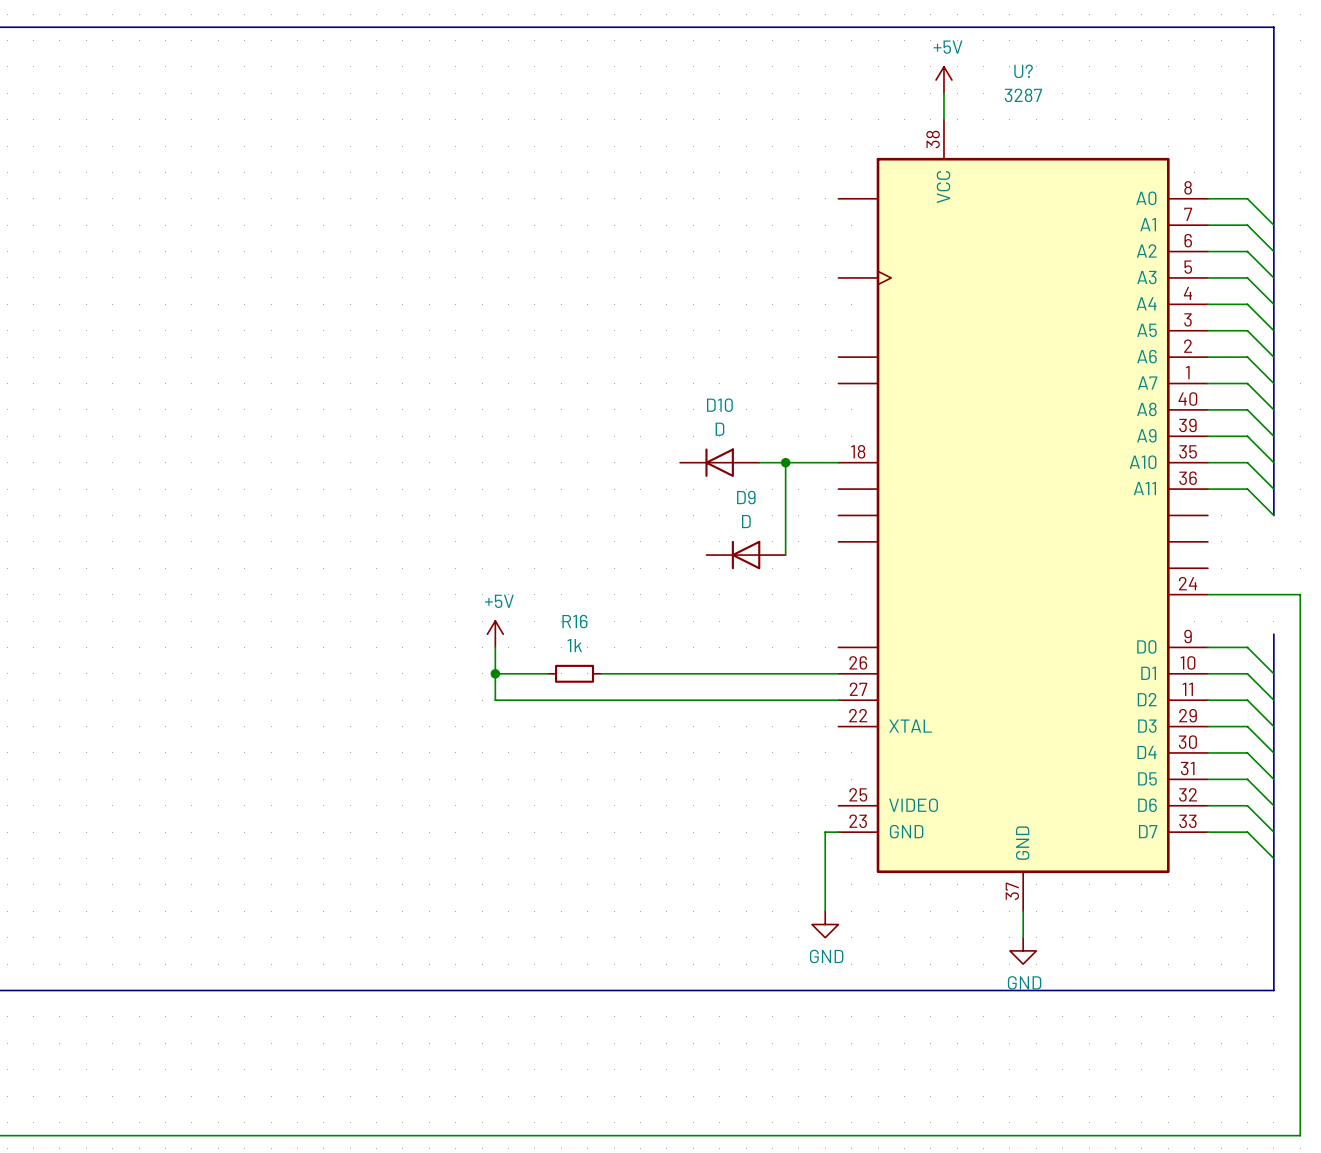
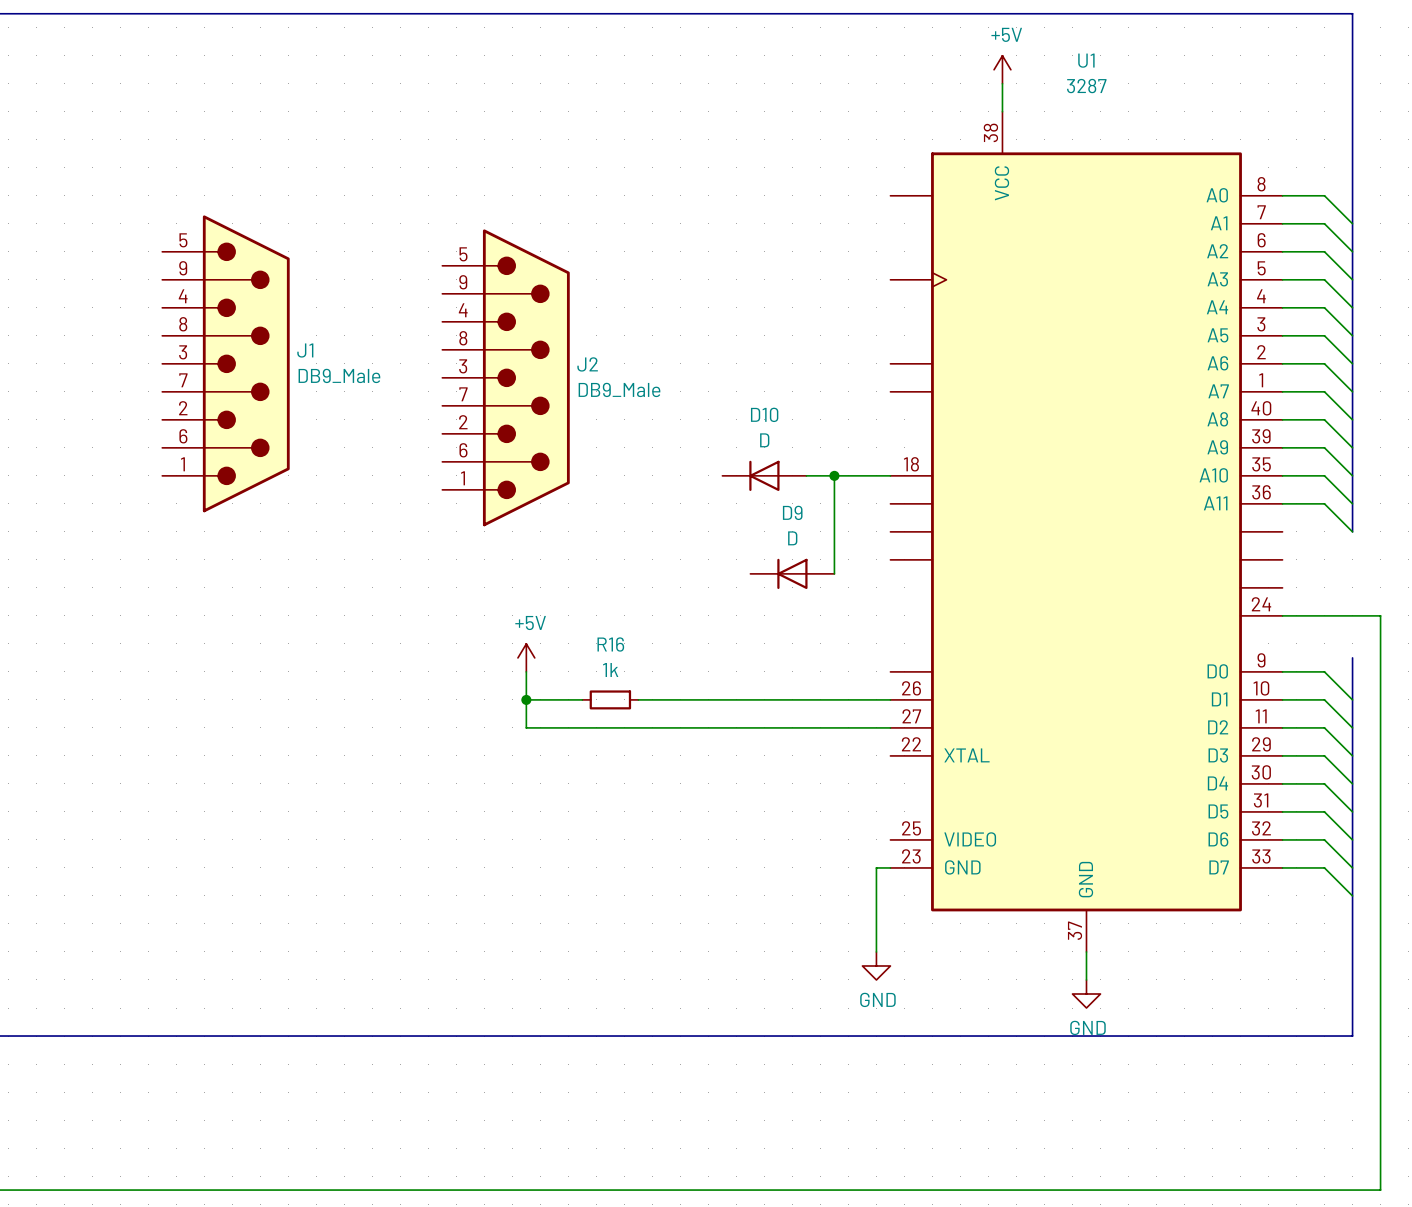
U? name: U? (1023, 71) -> U1 (1086, 60)
J1: none -> DB9_Male (225, 363)
J2: none -> DB9_Male (506, 377)

